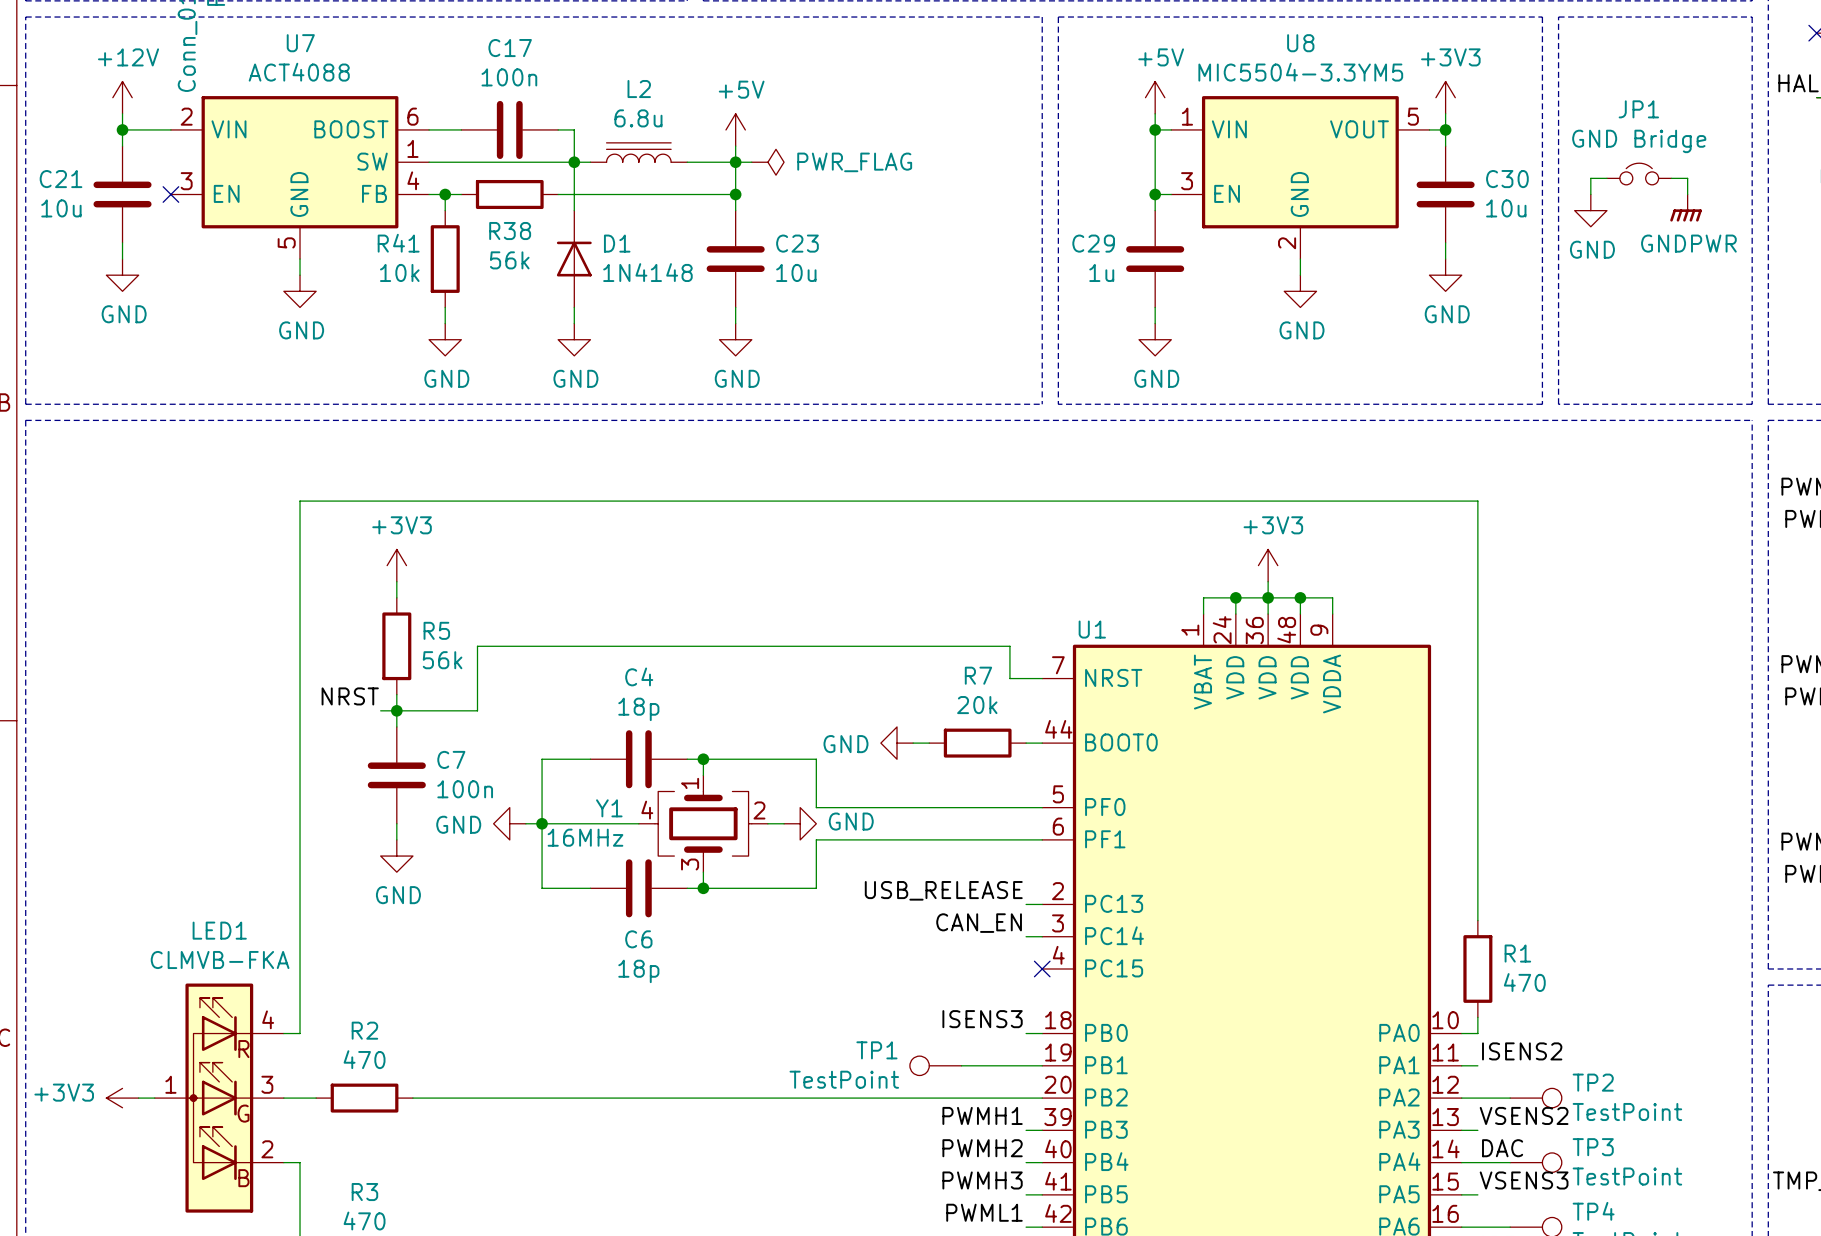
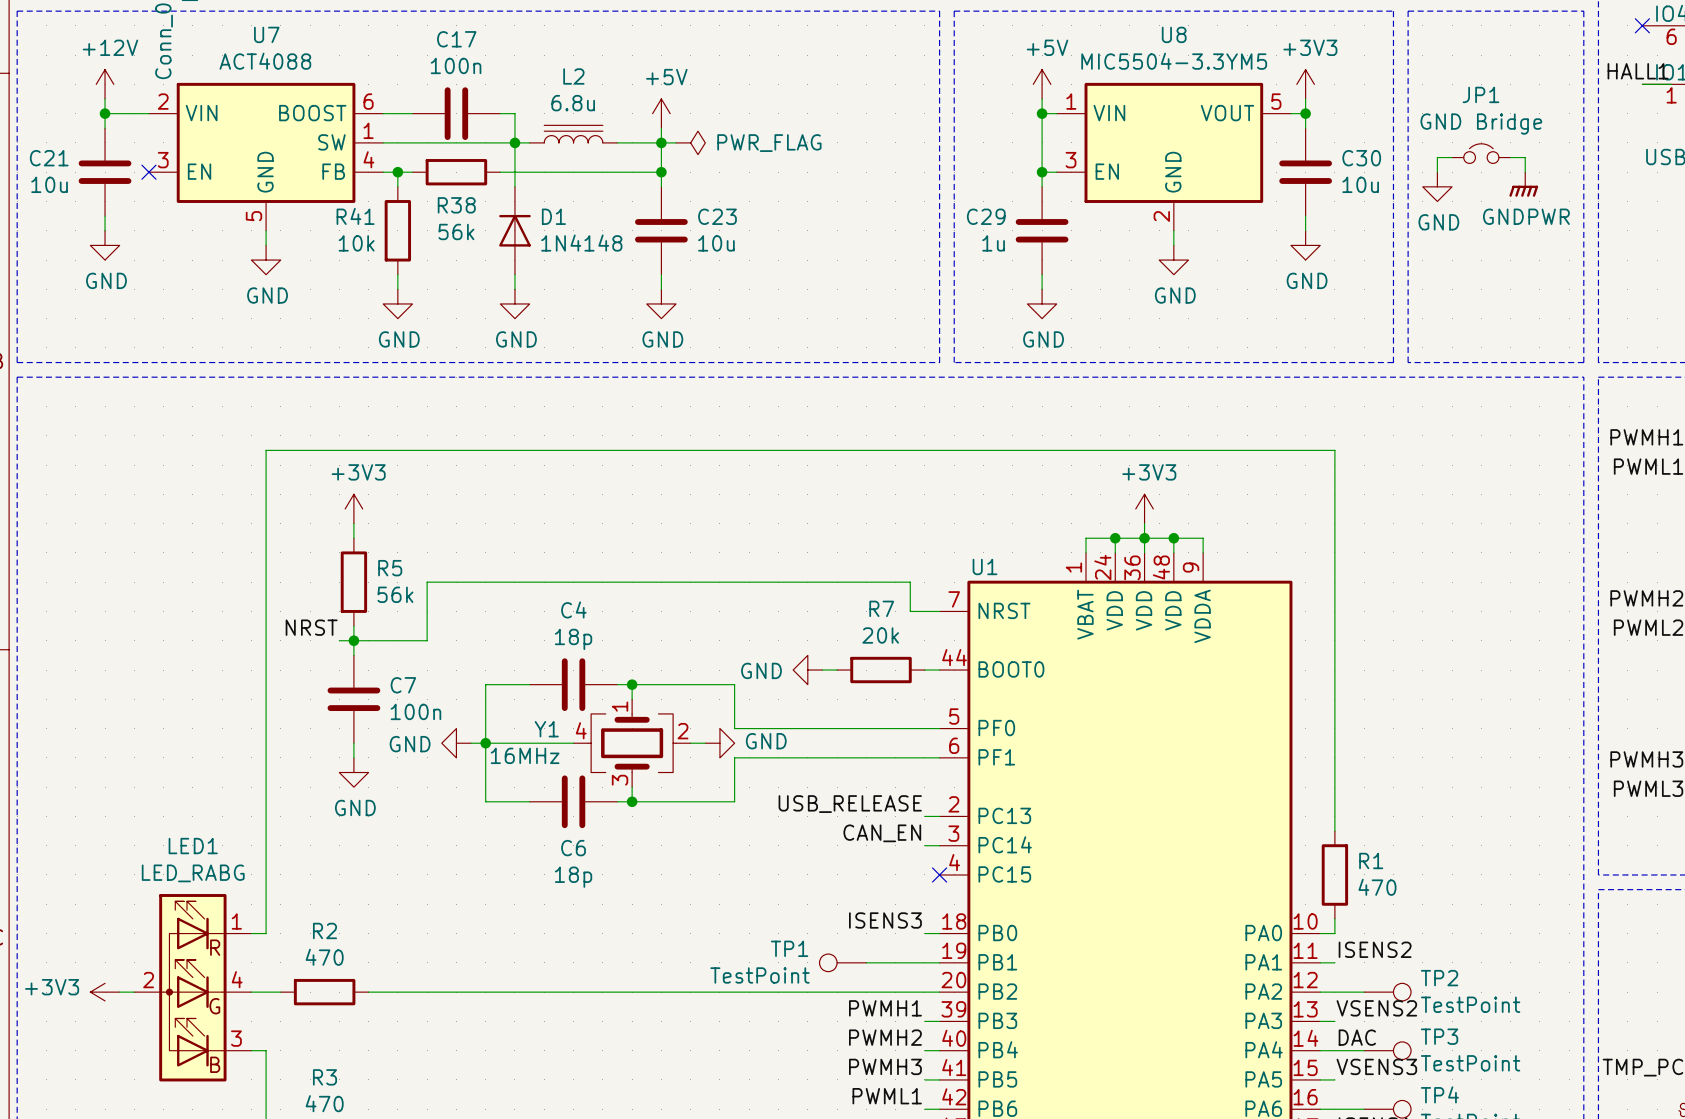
LED1 value: CLMVB-FKA (220, 960) -> LED_RABG (193, 873)
LED1 symbol: [154, 983, 284, 1213] -> [134, 894, 252, 1082]

